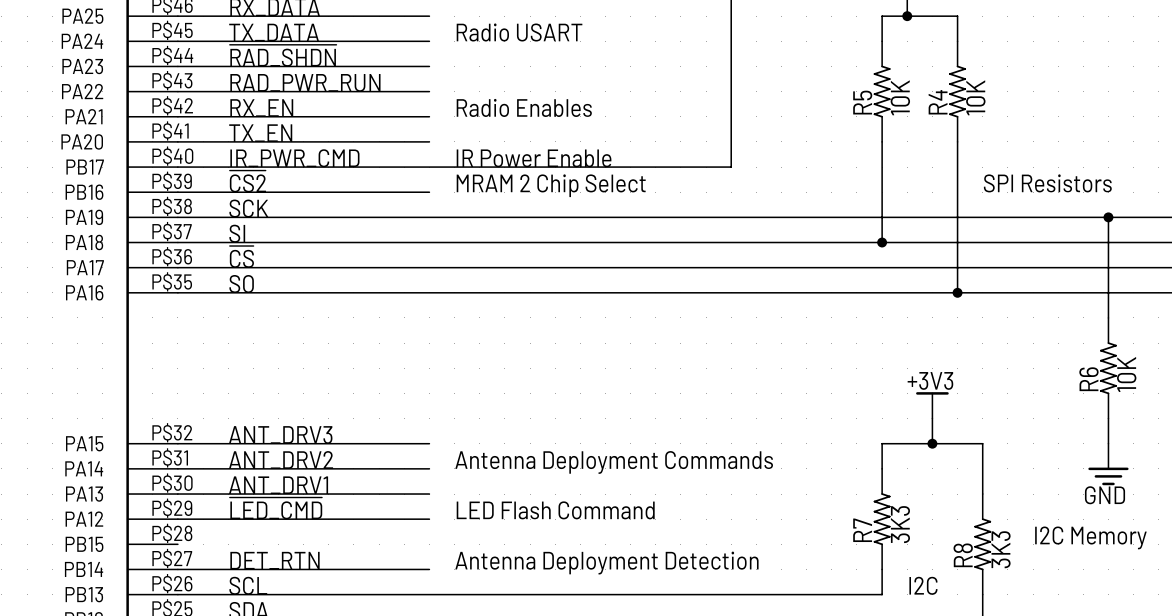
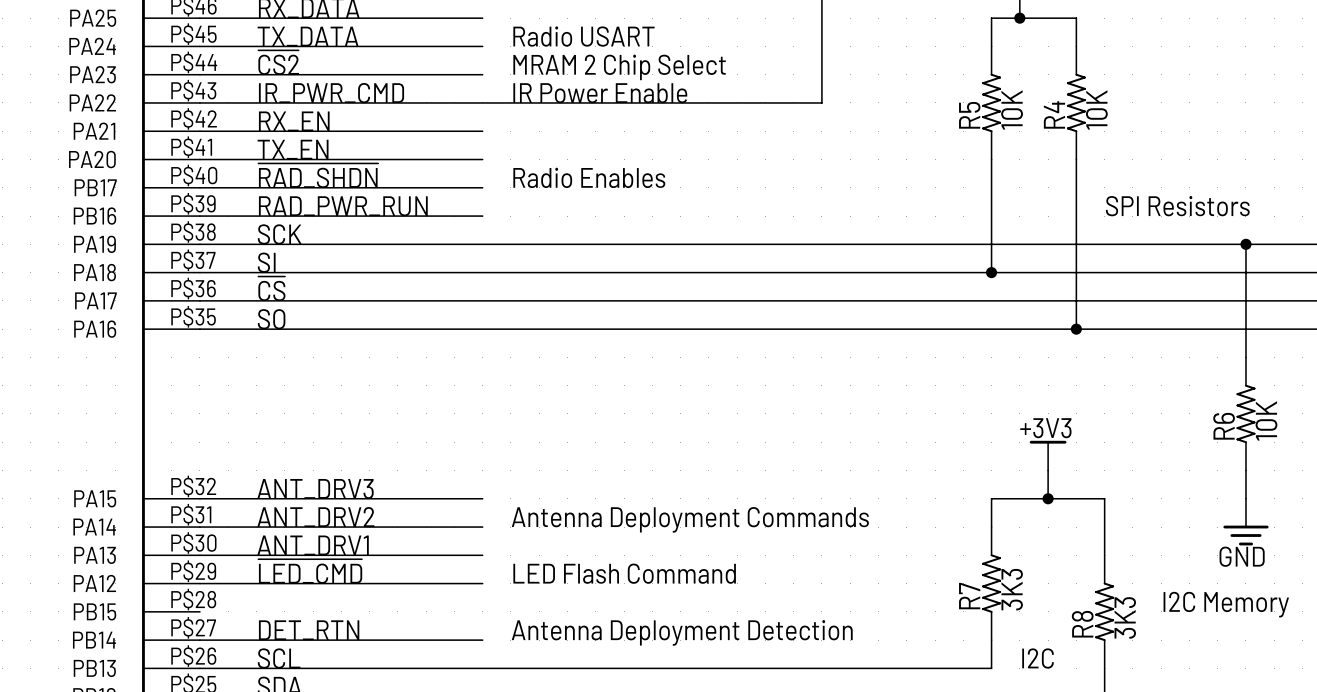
label: ~{RAD_SHDN} (283, 55) -> ~{CS2} (278, 62)
label: RAD_PWR_RUN (305, 82) -> IR_PWR_CMD (331, 93)
wire: (731, 91) (731, 167) (429, 167) -> (821, 102) (482, 102)
text: Radio Enables (524, 107) -> IR Power Enable (600, 93)
label: IR_PWR_CMD (294, 158) -> ~{RAD_SHDN} (318, 175)
text: IR Power Enable (534, 158) -> Radio Enables (589, 177)
label: ~{CS2} (247, 181) -> RAD_PWR_RUN (343, 206)
text position: MRAM 2 Chip Select (551, 185) -> MRAM 2 Chip Select (619, 67)

